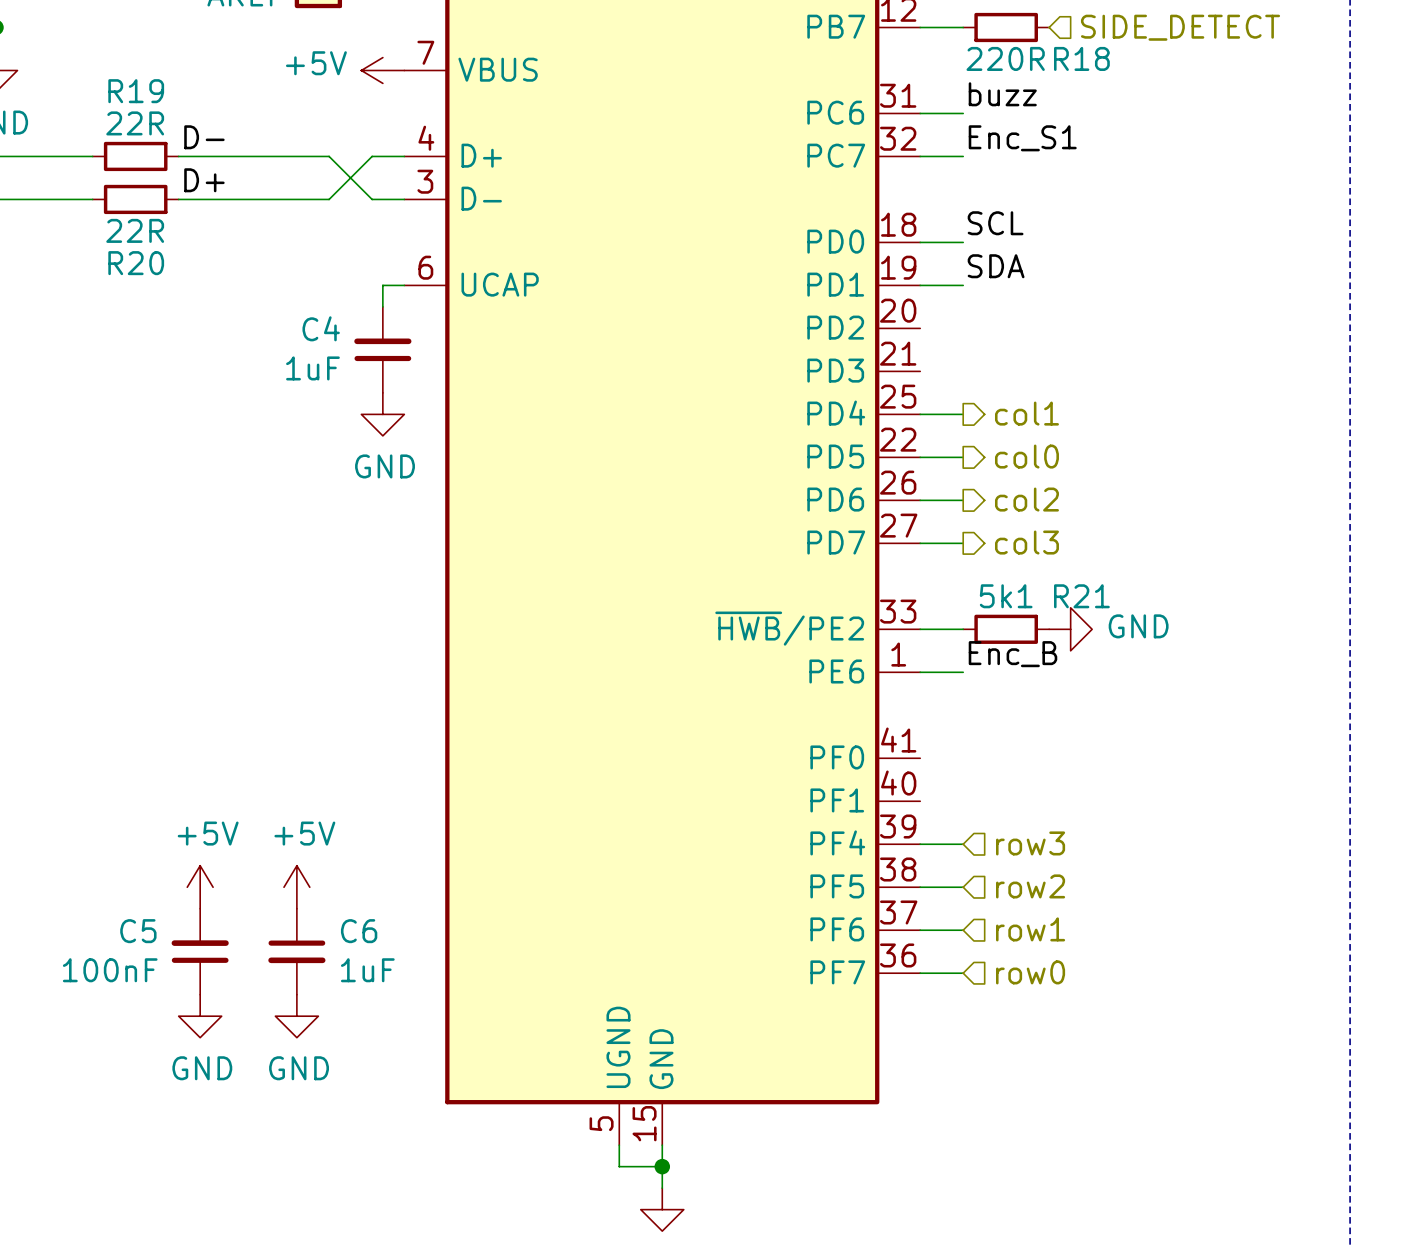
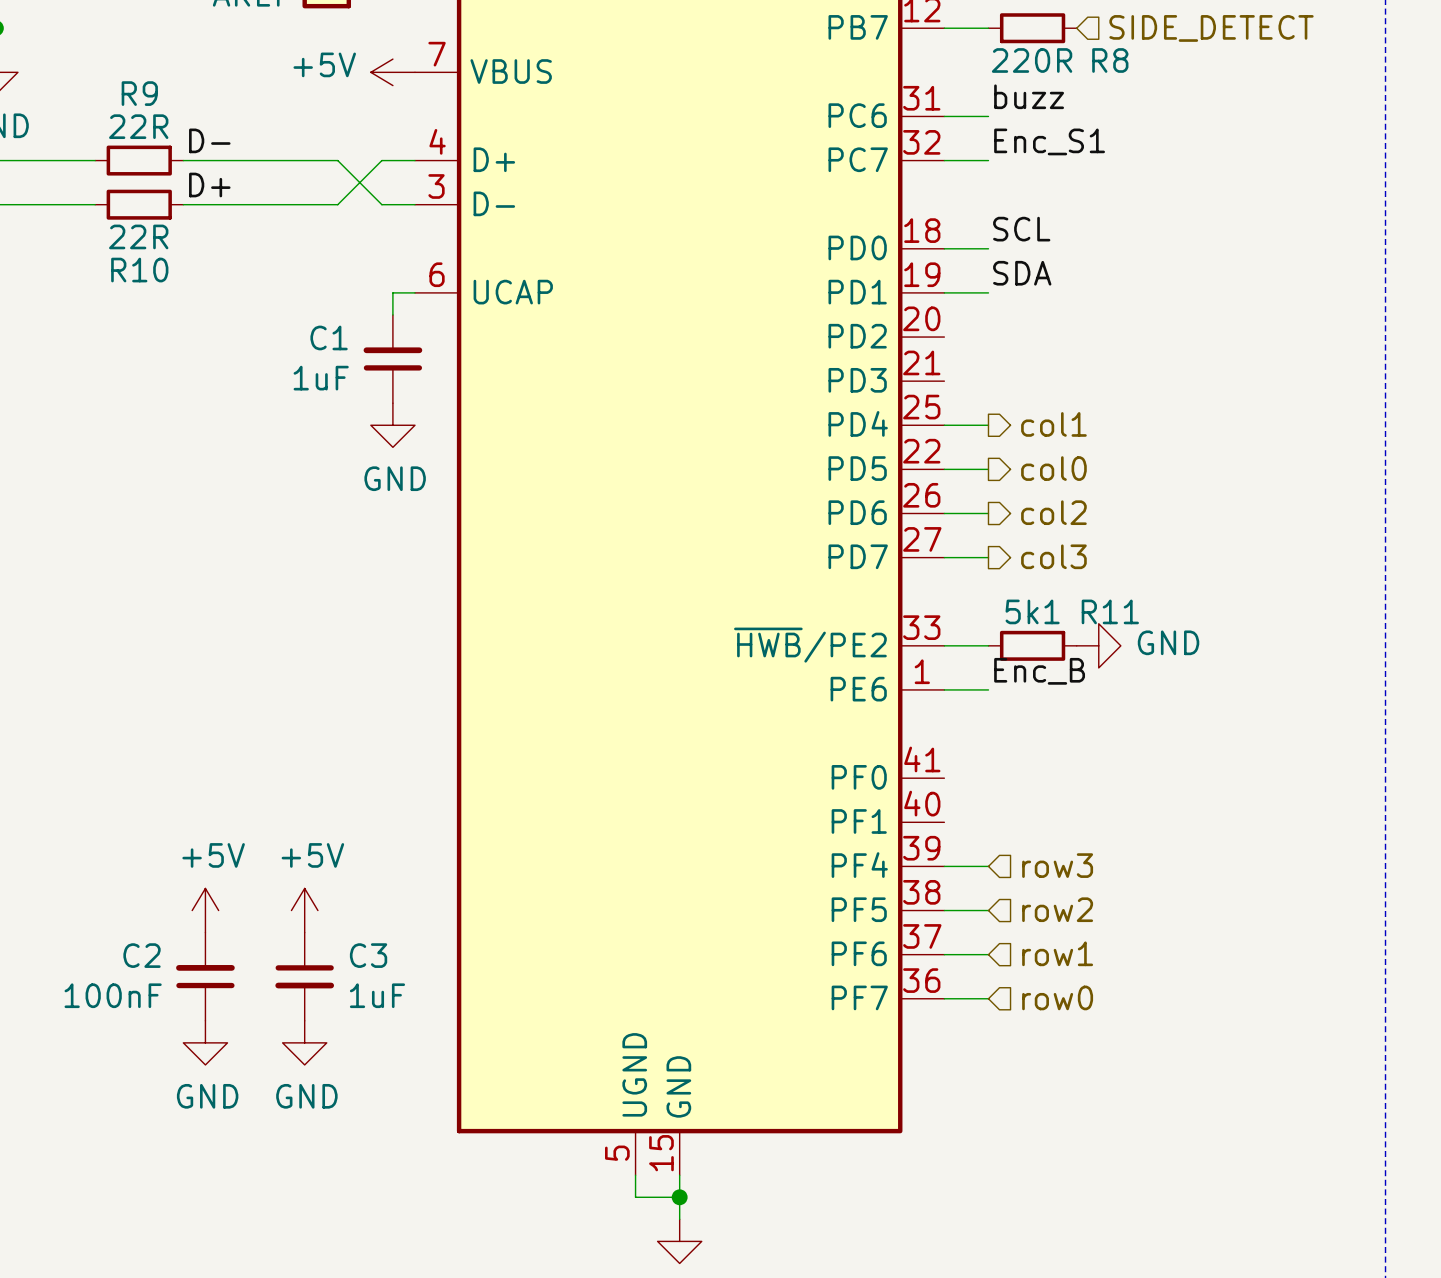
R18 name: R18 (1081, 58) -> R8 (1110, 60)
R19 name: R19 (136, 91) -> R9 (139, 93)
R20 name: R20 (136, 263) -> R10 (139, 270)
C4 name: C4 (321, 328) -> C1 (329, 337)
R21 name: R21 (1081, 596) -> R11 (1110, 611)
C5 name: C5 (138, 931) -> C2 (142, 955)
C6 name: C6 (359, 931) -> C3 (368, 955)

